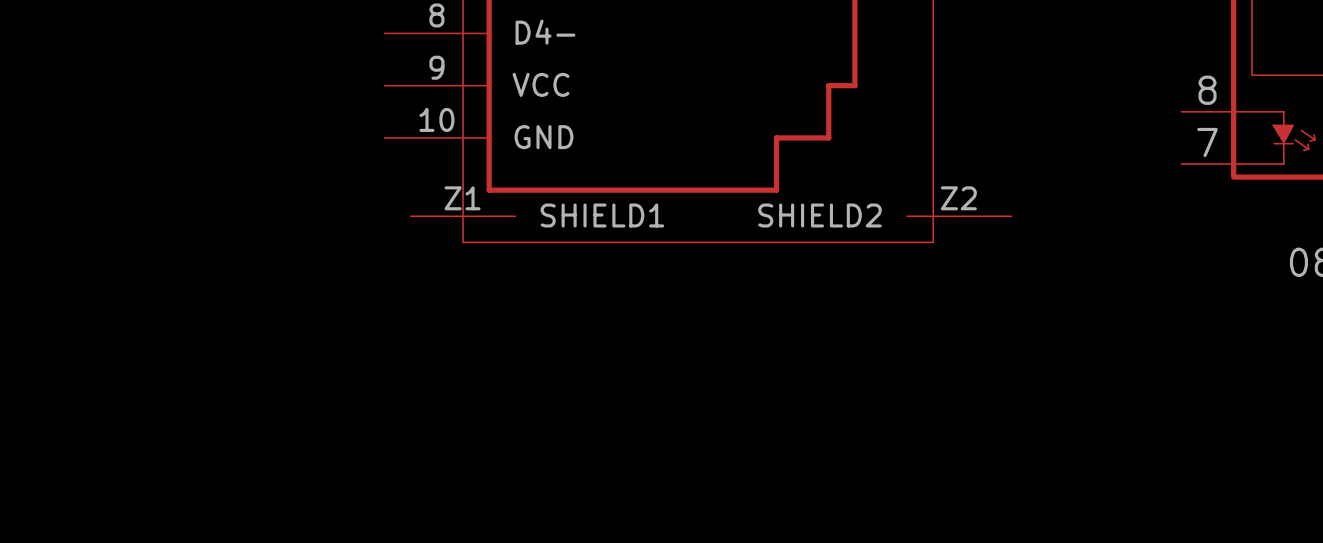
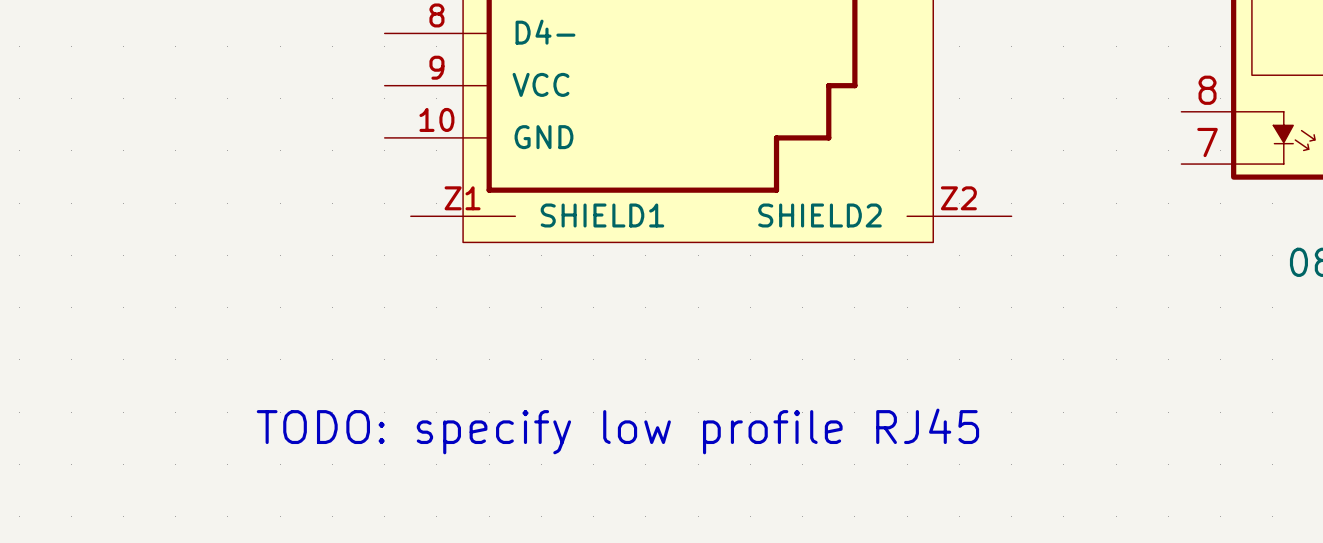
text: none -> TODO: specify low profile RJ45 (617, 431)

